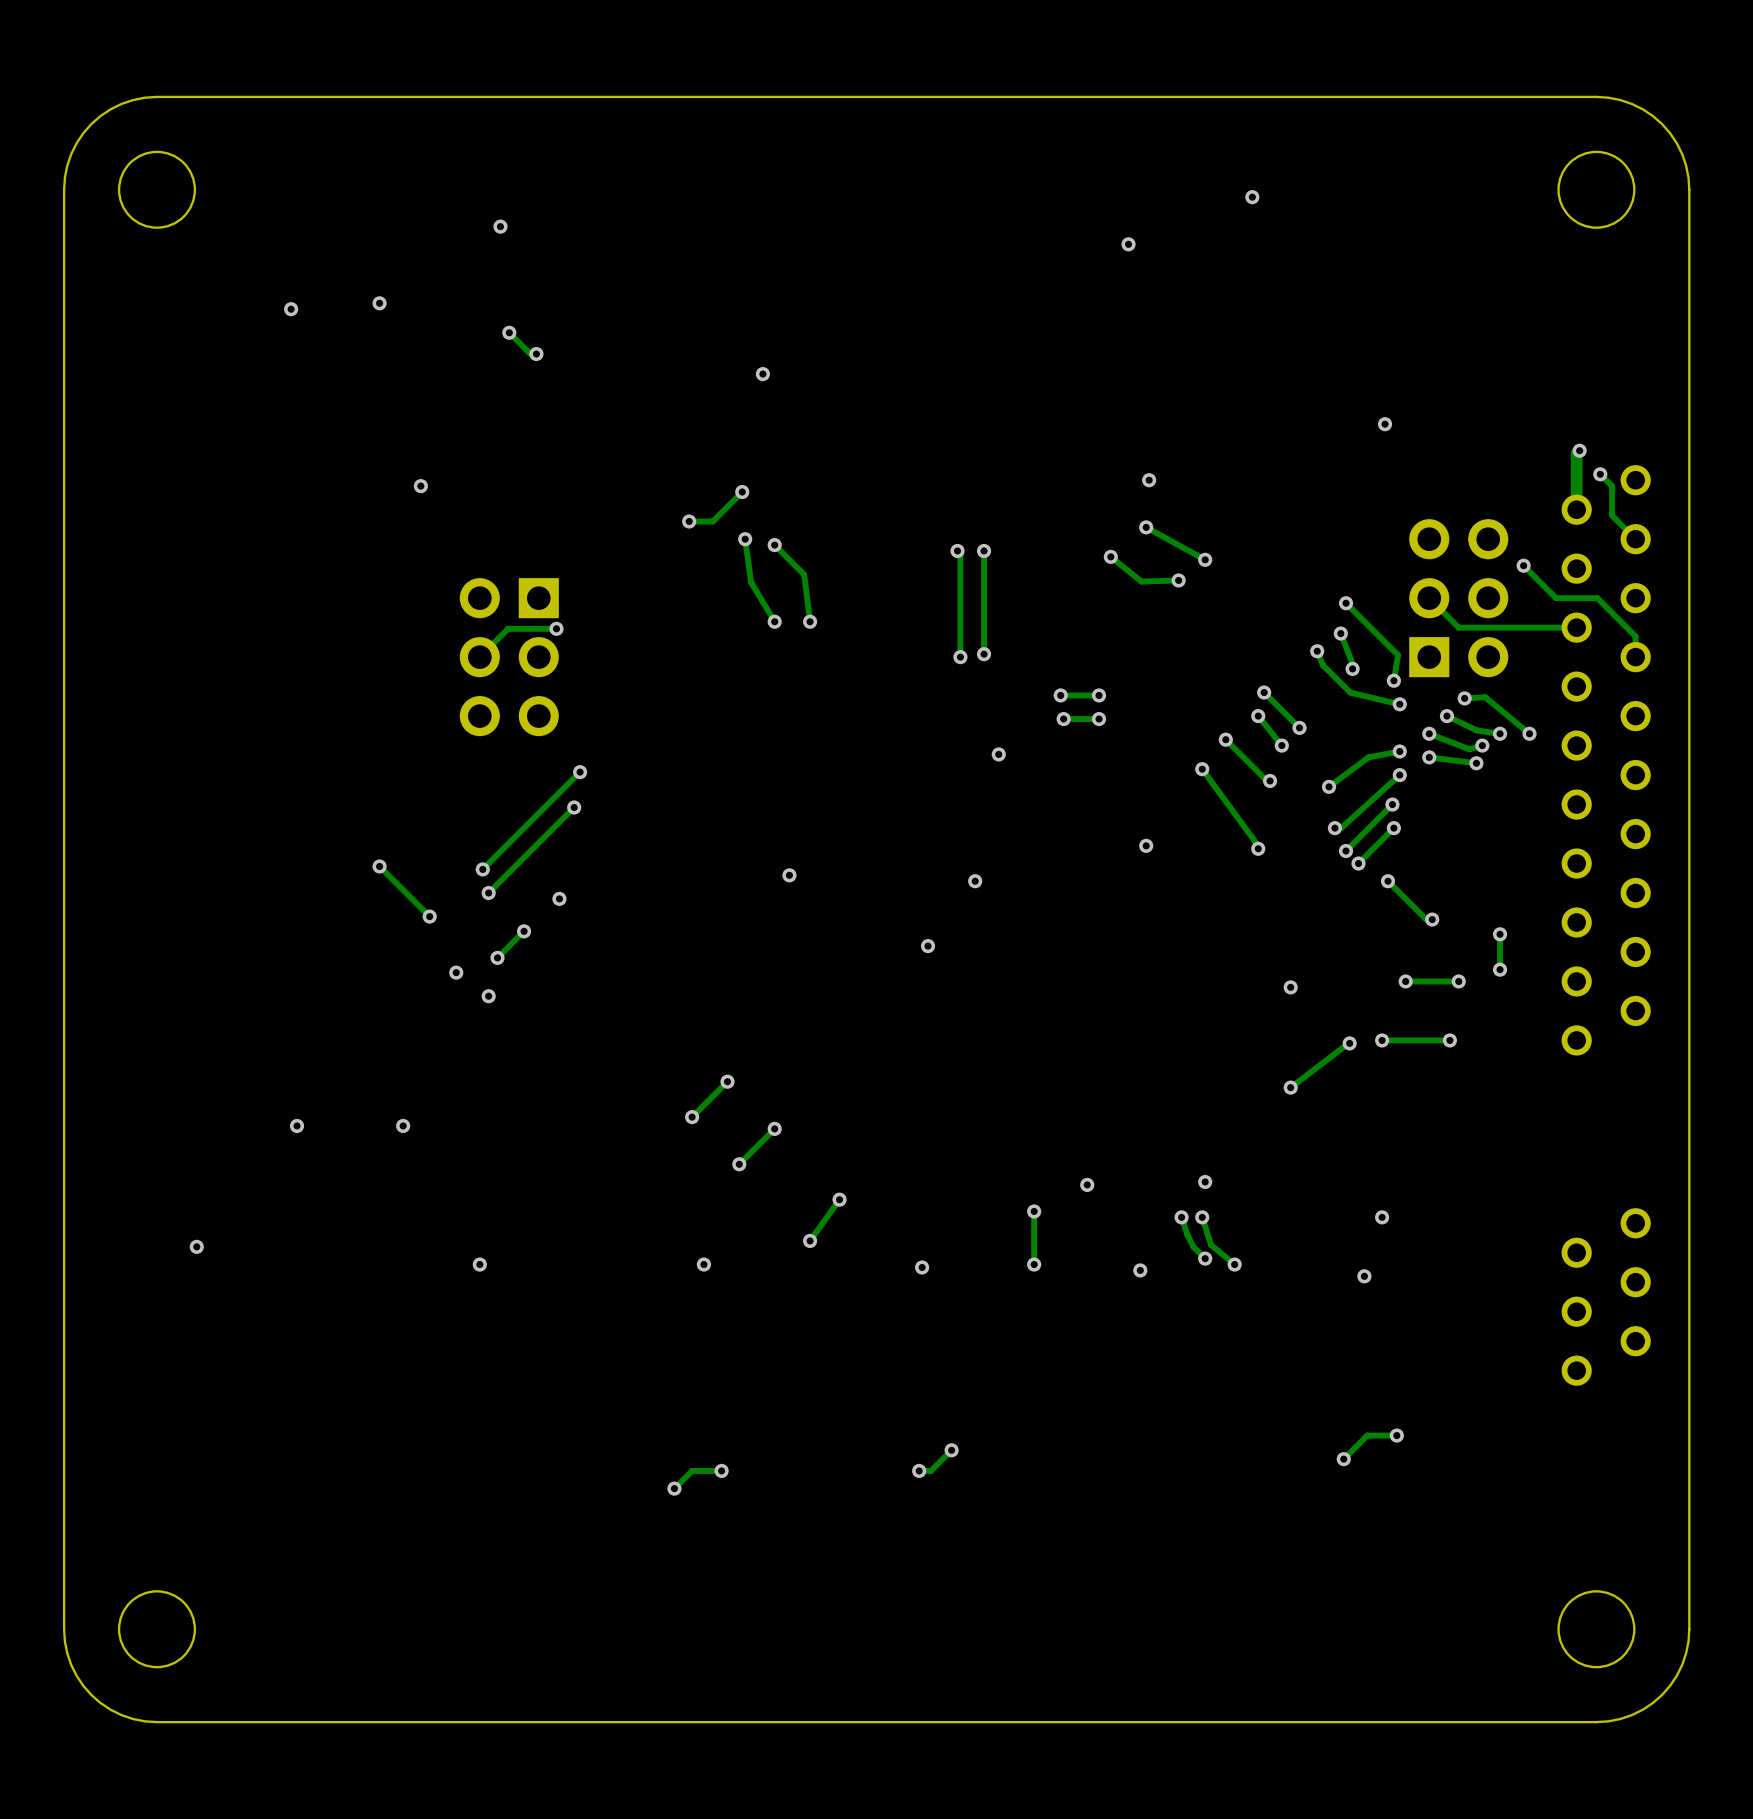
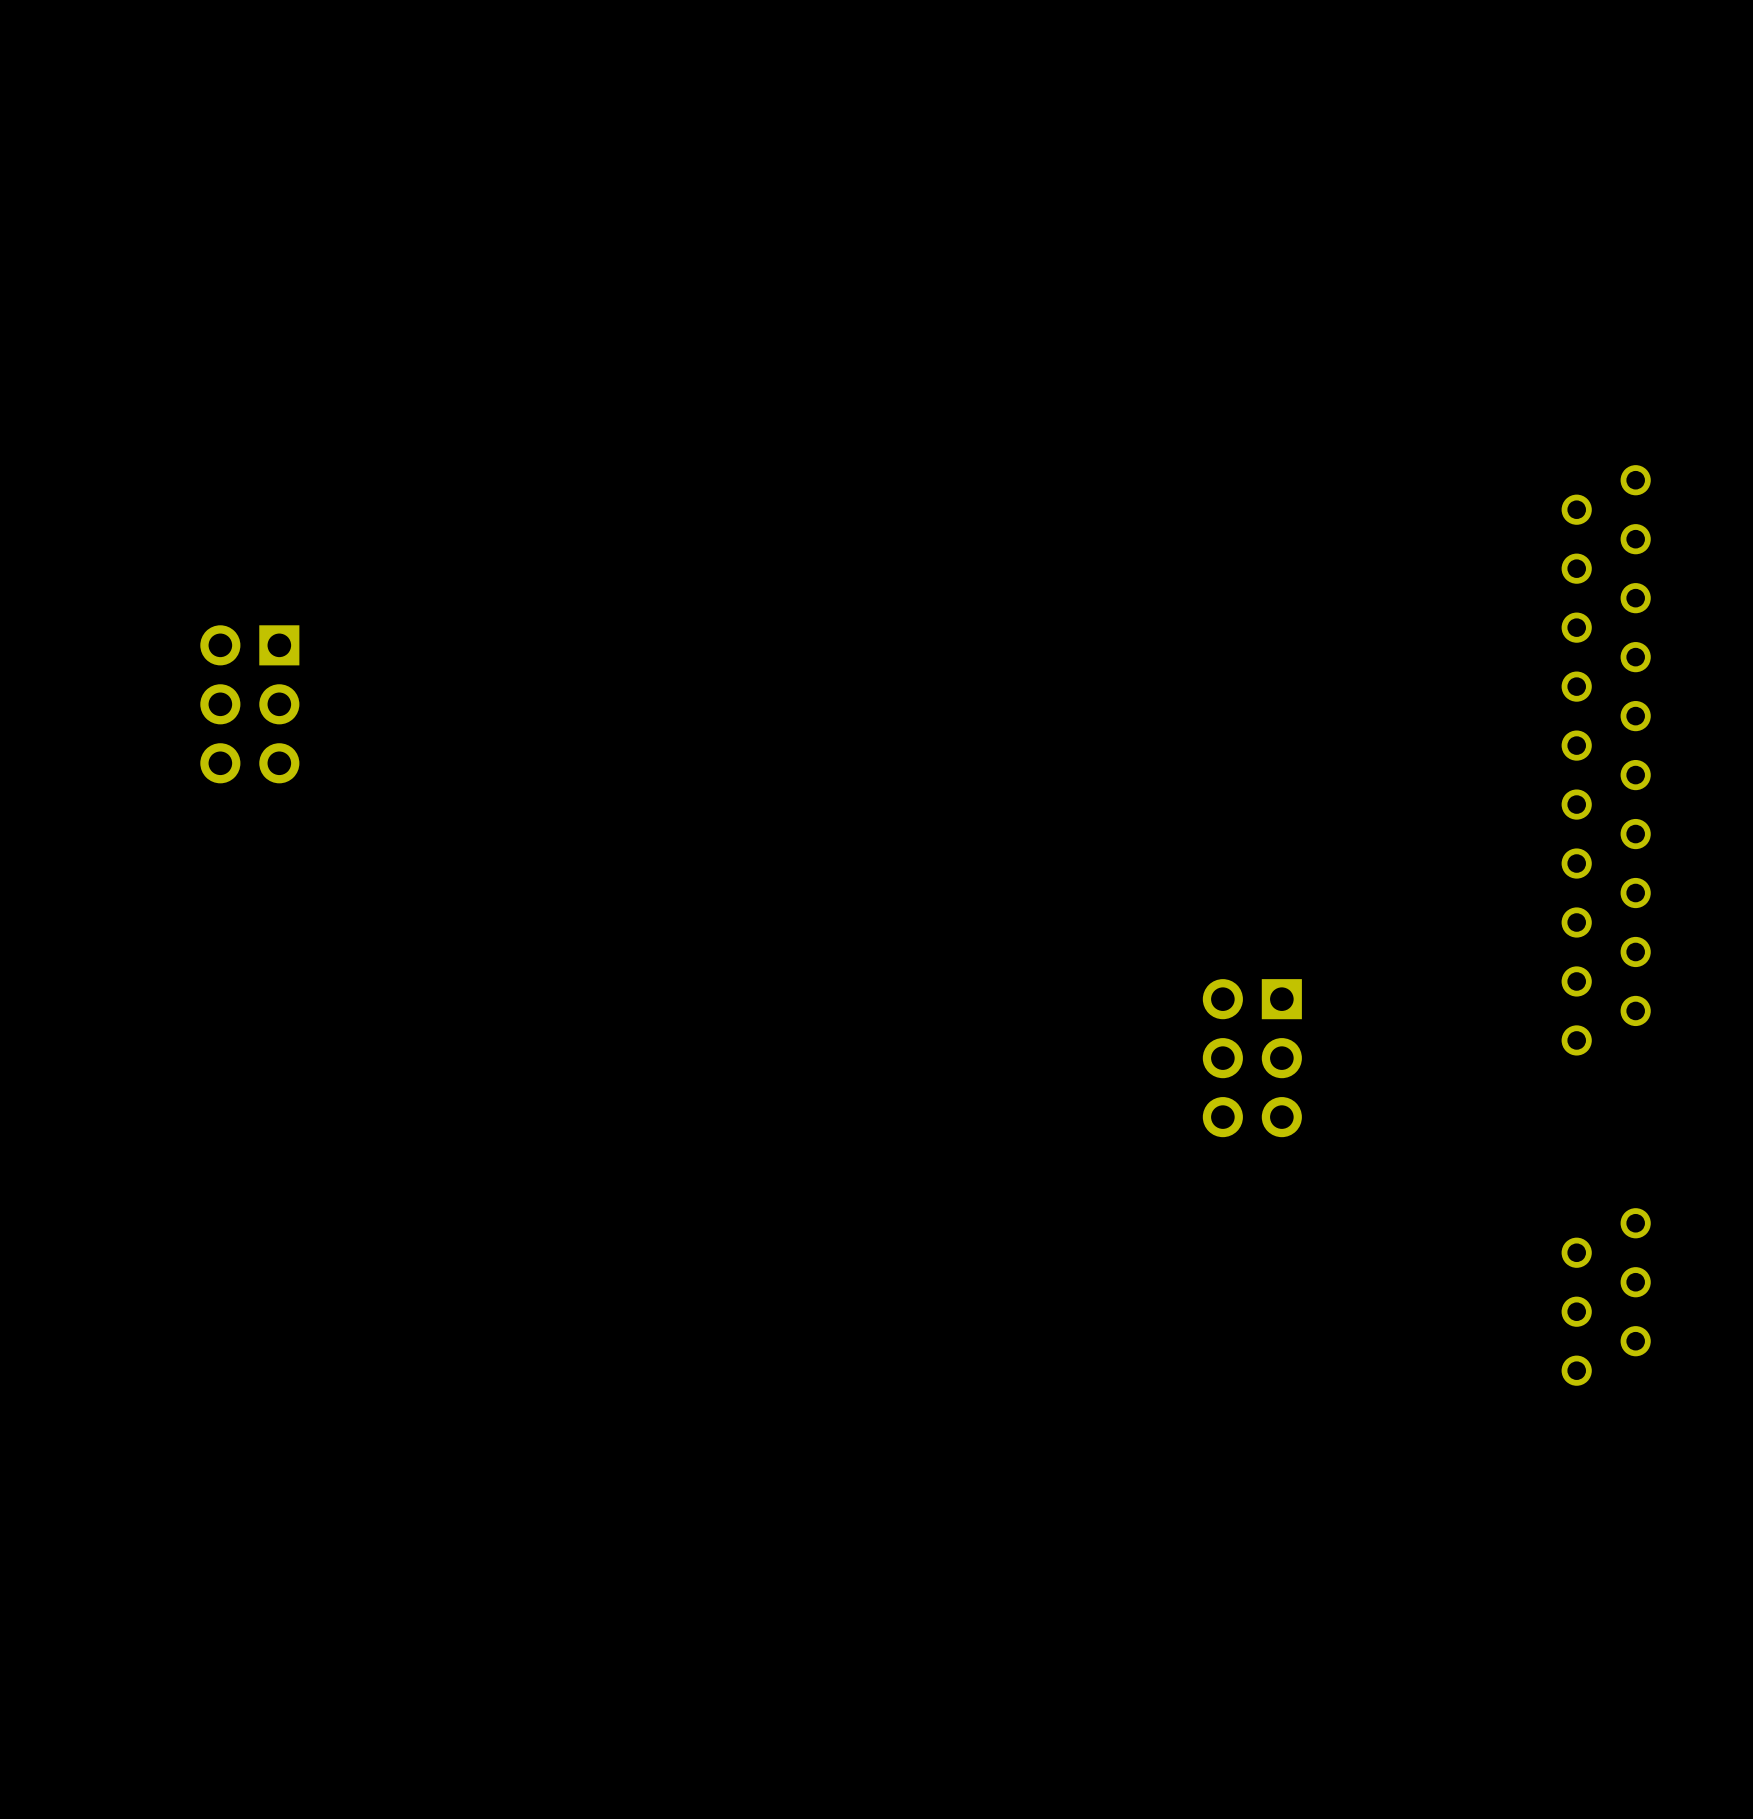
board edge: (1596, 96) (156, 96) (132, 100) (121, 103) (100, 116) (91, 124) (76, 143) (71, 154) (67, 165) (64, 189) (64, 1629) (67, 1653) (71, 1664) (76, 1675) (91, 1694) (110, 1709) (121, 1715) (132, 1718) (156, 1722) (1596, 1722) (1620, 1718) (1631, 1715) (1642, 1709) (1662, 1694) (1676, 1675) (1682, 1664) (1686, 1653) (1689, 1629) (1689, 189) (1686, 165) (1682, 154) (1676, 143) (1662, 124) (1652, 116) (1631, 103) (1620, 100) (1596, 96) -> none
round board edge: [117, 150, 197, 229] -> none
round board edge: [1557, 150, 1636, 229] -> none
via: (1252, 197) -> none
via: (500, 226) -> none
via: (1128, 244) -> none
via: (379, 303) -> none
via: (291, 309) -> none
track: (509, 332) (530, 354) (536, 354) -> none
via: (509, 332) -> none
via: (536, 354) -> none
via: (762, 374) -> none
via: (1385, 424) -> none
track: (1579, 450) (1576, 453) (1576, 509) -> none
via: (1579, 450) -> none
track: (1600, 474) (1612, 486) (1612, 515) (1635, 539) -> none
via: (1600, 474) -> none
via: (1149, 480) -> none
via: (420, 486) -> none
track: (742, 492) (712, 521) (689, 521) -> none
via: (742, 492) -> none
via: (689, 521) -> none
track: (1146, 527) (1205, 559) -> none
via: (1146, 527) -> none
track: (745, 539) (751, 582) (774, 621) -> none
via: (745, 539) -> none
track: (774, 545) (804, 574) (810, 621) -> none
via: (774, 545) -> none
track: (957, 550) (960, 553) (960, 657) -> none
via: (957, 550) -> none
track: (984, 550) (984, 654) -> none
via: (984, 550) -> none
track: (1110, 556) (1141, 581) (1178, 580) -> none
via: (1110, 556) -> none
via: (1205, 559) -> none
track: (1523, 565) (1556, 598) (1597, 598) (1635, 636) (1635, 657) -> none
via: (1523, 565) -> none
via: (1178, 580) -> none
track: (1429, 598) (1458, 627) (1576, 627) -> none
part: (1458, 598) -> none
track: (1346, 603) (1398, 655) (1393, 680) -> none
via: (1346, 603) -> none
via: (774, 621) -> none
via: (810, 621) -> none
track: (556, 628) (508, 628) (479, 657) -> none
via: (556, 628) -> none
track: (1340, 633) (1354, 667) (1352, 668) -> none
via: (1340, 633) -> none
track: (1317, 651) (1322, 665) (1350, 692) (1399, 704) -> none
via: (1317, 651) -> none
via: (984, 654) -> none
part position: (509, 657) -> (249, 704)
via: (960, 657) -> none
via: (1352, 668) -> none
via: (1393, 680) -> none
track: (1264, 692) (1299, 727) -> none
via: (1264, 692) -> none
via: (1060, 695) -> none
track: (1099, 695) (1060, 695) -> none
via: (1099, 695) -> none
track: (1464, 698) (1485, 697) (1529, 733) -> none
via: (1464, 698) -> none
via: (1399, 704) -> none
track: (1258, 716) (1281, 745) -> none
via: (1258, 716) -> none
track: (1446, 716) (1476, 730) (1500, 733) -> none
via: (1446, 716) -> none
via: (1063, 719) -> none
track: (1099, 719) (1063, 719) -> none
via: (1099, 719) -> none
via: (1299, 727) -> none
track: (1429, 733) (1469, 749) (1482, 745) -> none
via: (1429, 733) -> none
via: (1500, 733) -> none
via: (1529, 733) -> none
track: (1225, 739) (1267, 780) (1270, 780) -> none
via: (1225, 739) -> none
via: (1281, 745) -> none
via: (1482, 745) -> none
track: (1399, 751) (1368, 757) (1329, 786) -> none
via: (1399, 751) -> none
via: (998, 754) -> none
track: (1429, 757) (1476, 763) -> none
via: (1429, 757) -> none
via: (1476, 763) -> none
track: (1202, 769) (1258, 845) (1258, 848) -> none
via: (1202, 769) -> none
track: (580, 772) (482, 869) -> none
via: (580, 772) -> none
track: (1399, 775) (1341, 828) (1334, 828) -> none
via: (1399, 775) -> none
via: (1270, 780) -> none
via: (1329, 786) -> none
track: (1392, 804) (1346, 851) -> none
via: (1392, 804) -> none
track: (574, 807) (488, 893) -> none
via: (574, 807) -> none
via: (1334, 828) -> none
track: (1393, 828) (1358, 863) -> none
via: (1393, 828) -> none
via: (1146, 845) -> none
via: (1258, 848) -> none
via: (1346, 851) -> none
via: (1358, 863) -> none
track: (379, 866) (429, 916) -> none
via: (379, 866) -> none
via: (482, 869) -> none
via: (789, 875) -> none
via: (975, 881) -> none
track: (1387, 881) (1426, 919) (1432, 919) -> none
via: (1387, 881) -> none
via: (488, 893) -> none
via: (559, 898) -> none
via: (429, 916) -> none
via: (1432, 919) -> none
track: (524, 931) (497, 957) -> none
via: (524, 931) -> none
track: (1500, 934) (1500, 969) -> none
via: (1500, 934) -> none
via: (928, 946) -> none
via: (497, 957) -> none
via: (1500, 969) -> none
via: (456, 972) -> none
via: (1405, 981) -> none
track: (1458, 981) (1405, 981) -> none
via: (1458, 981) -> none
via: (1290, 987) -> none
via: (488, 996) -> none
via: (1382, 1040) -> none
track: (1449, 1040) (1382, 1040) -> none
via: (1449, 1040) -> none
track: (1349, 1043) (1290, 1087) -> none
via: (1349, 1043) -> none
part: none -> (1252, 1058)
track: (727, 1081) (692, 1117) -> none
via: (727, 1081) -> none
via: (1290, 1087) -> none
via: (692, 1117) -> none
via: (297, 1125) -> none
via: (403, 1125) -> none
track: (774, 1128) (739, 1164) -> none
via: (774, 1128) -> none
via: (739, 1164) -> none
via: (1205, 1181) -> none
via: (1087, 1184) -> none
track: (839, 1199) (810, 1240) -> none
via: (839, 1199) -> none
track: (1034, 1211) (1034, 1264) -> none
via: (1034, 1211) -> none
track: (1181, 1217) (1193, 1246) (1205, 1258) -> none
via: (1181, 1217) -> none
track: (1202, 1217) (1211, 1244) (1234, 1264) -> none
via: (1202, 1217) -> none
via: (1382, 1217) -> none
via: (810, 1240) -> none
via: (196, 1246) -> none
via: (1205, 1258) -> none
via: (479, 1264) -> none
via: (703, 1264) -> none
via: (1034, 1264) -> none
via: (1234, 1264) -> none
via: (922, 1267) -> none
via: (1140, 1270) -> none
via: (1364, 1276) -> none
track: (1396, 1435) (1367, 1435) (1343, 1459) -> none
via: (1396, 1435) -> none
track: (951, 1450) (930, 1470) (919, 1470) -> none
via: (951, 1450) -> none
via: (1343, 1459) -> none
track: (721, 1470) (692, 1470) (674, 1488) -> none
via: (721, 1470) -> none
via: (919, 1470) -> none
via: (674, 1488) -> none
round board edge: [117, 1590, 197, 1669] -> none
round board edge: [1557, 1590, 1636, 1669] -> none

